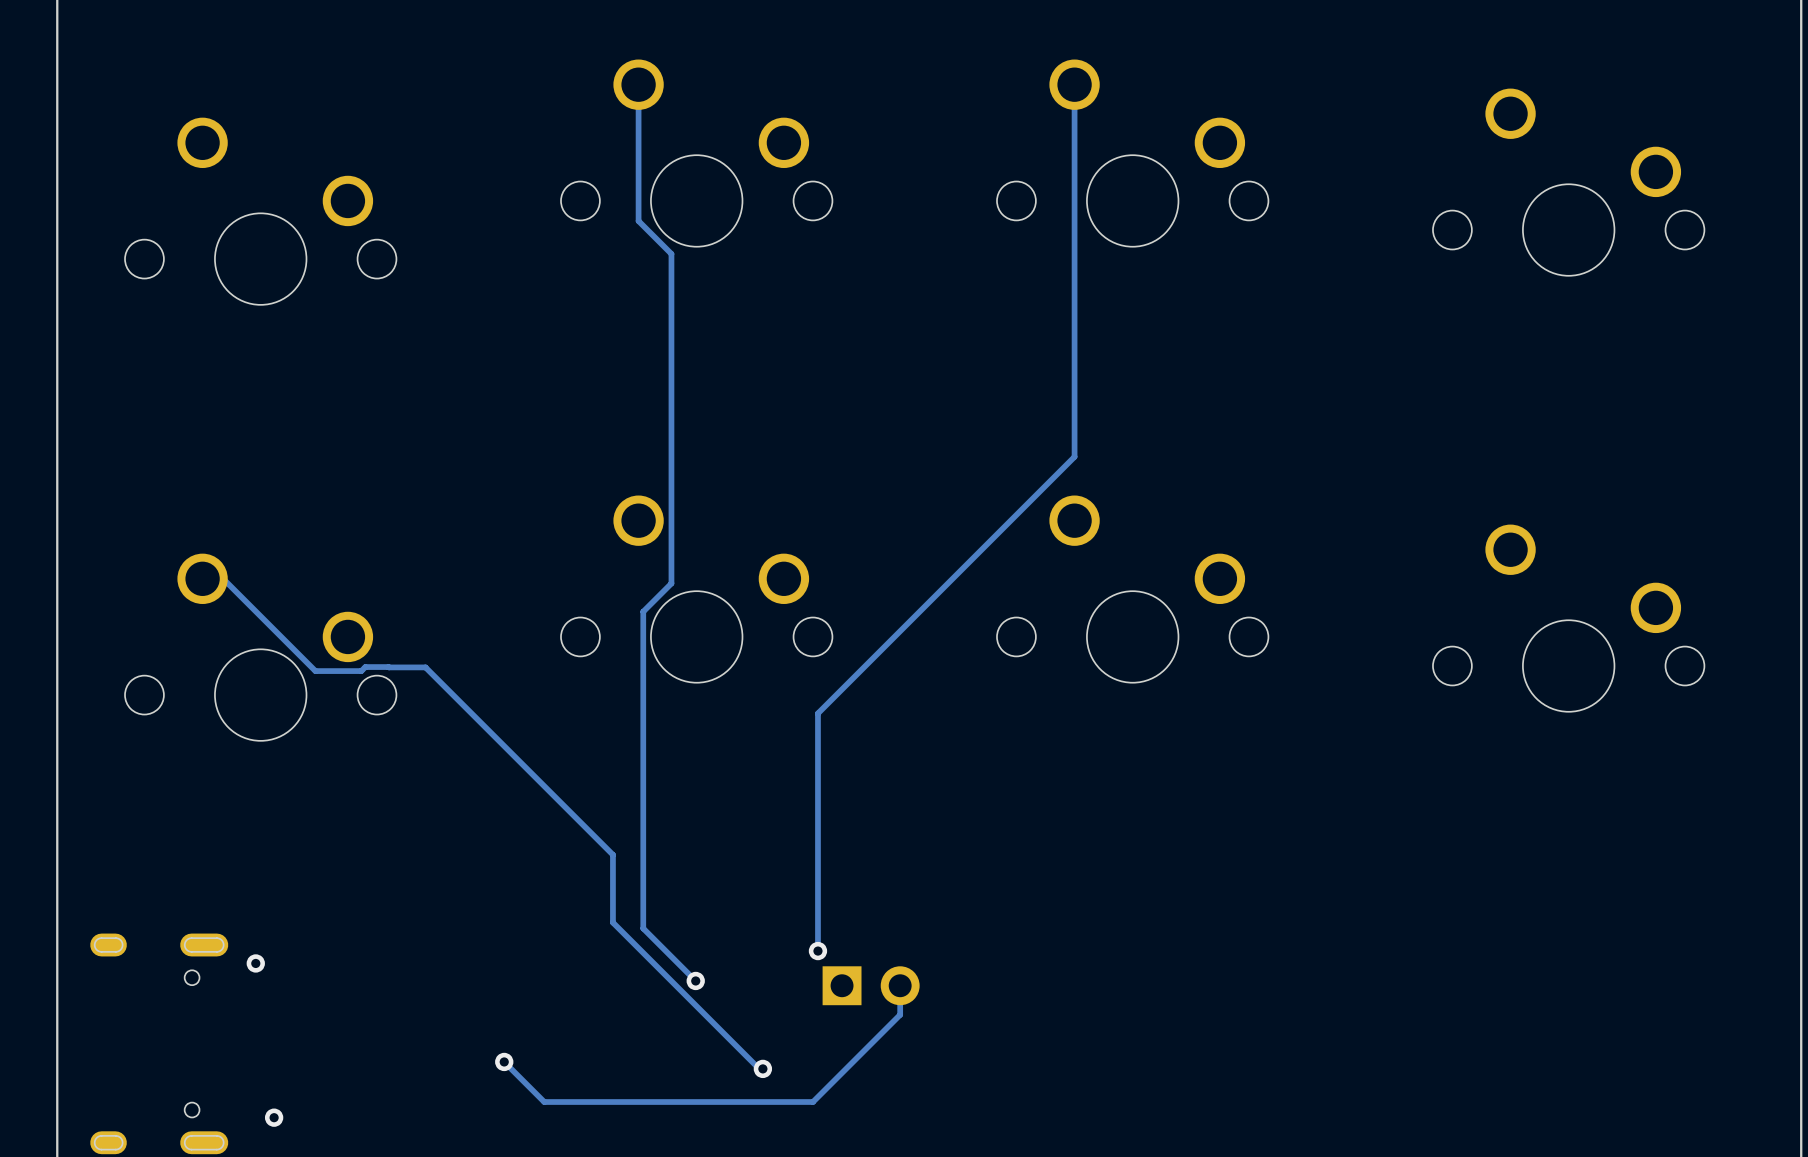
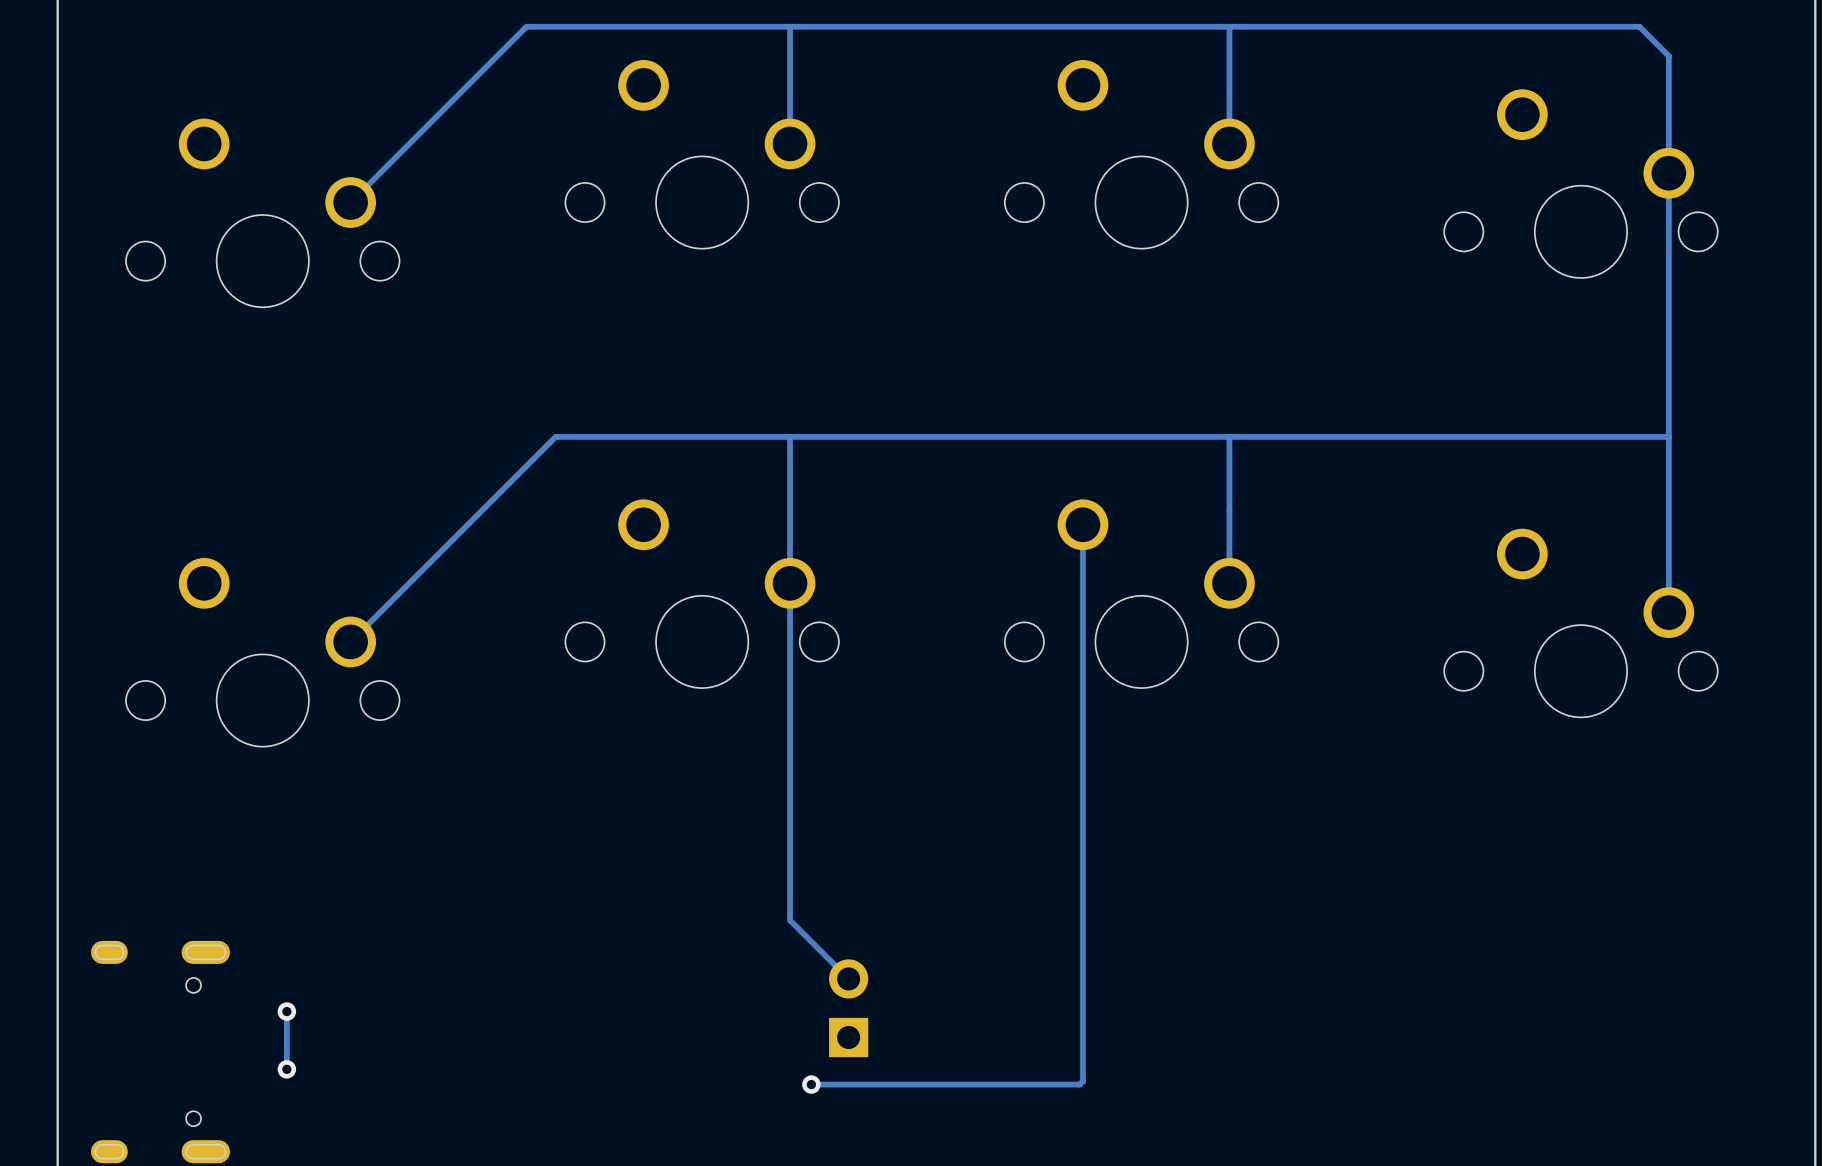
track: none -> (790, 26) (790, 143)
track: none -> (1229, 26) (1229, 143)
track: (638, 84) (638, 221) (671, 253) (671, 583) (643, 611) (643, 928) (695, 980) -> none
track: (1074, 84) (1074, 456) (817, 713) (817, 951) -> none
track: none -> (350, 202) (526, 26) (1639, 26) (1668, 56) (1668, 612)
track: none -> (790, 436) (790, 920) (848, 978)
track: none -> (1229, 436) (1229, 583)
track: none -> (1668, 436) (555, 436) (350, 641)
track: none -> (1082, 524) (1082, 1081) (1079, 1084) (811, 1084)
track: (202, 578) (223, 578) (315, 671) (361, 671) (365, 667) (425, 667) (612, 854) (612, 922) (759, 1068) (762, 1068) -> none
via: (817, 951) -> none
via position: (255, 963) -> (286, 1011)
via: (695, 980) -> none
part rotation: 0° (871, 985) -> 90° counterclockwise (848, 1008)
track: (900, 985) (900, 1014) (812, 1102) (544, 1102) (504, 1061) -> none
track: none -> (286, 1011) (286, 1069)
via: none -> (286, 1069)
via: (504, 1061) -> none
via position: (762, 1068) -> (811, 1084)
via: (274, 1117) -> none

